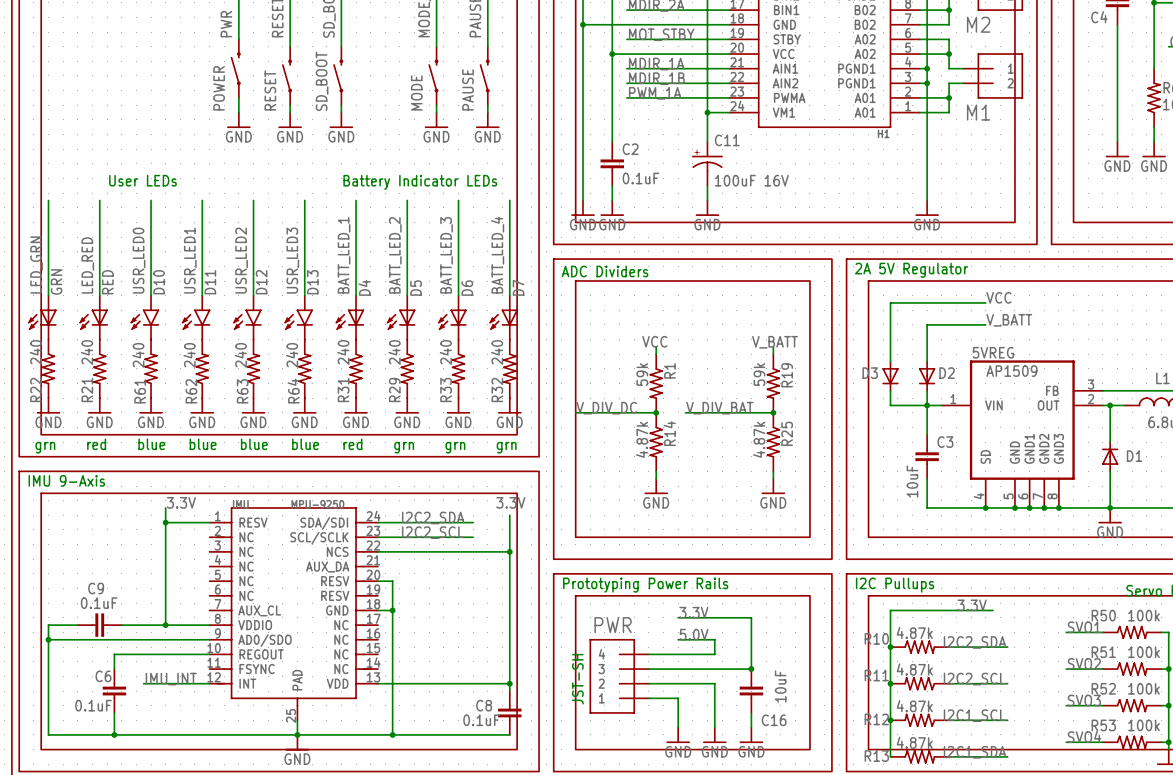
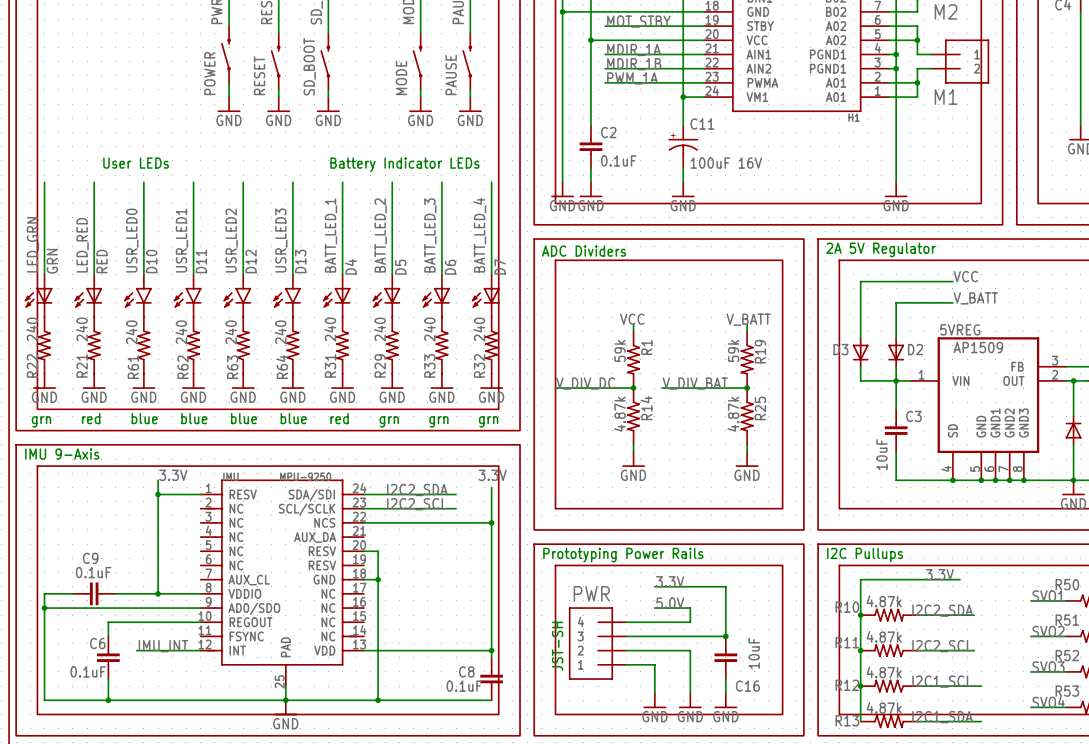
wire: none -> (974, 686) (981, 686)
wire: none -> (974, 721) (981, 721)

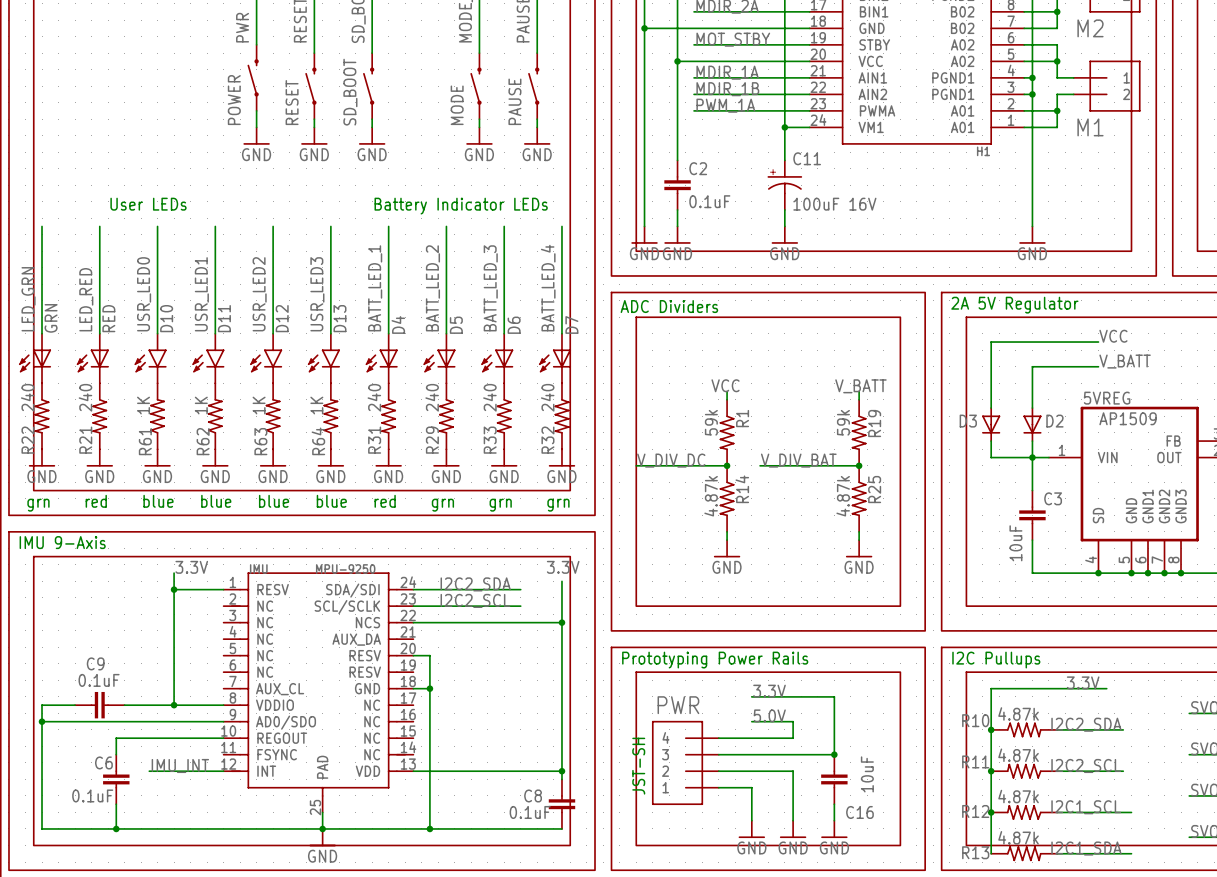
R61 value: 240 (131, 332) -> 1K (143, 405)
R62 value: 240 (181, 332) -> 1K (201, 405)
R63 value: 240 (230, 332) -> 1K (259, 405)
R64 value: 240 (280, 332) -> 1K (316, 405)

